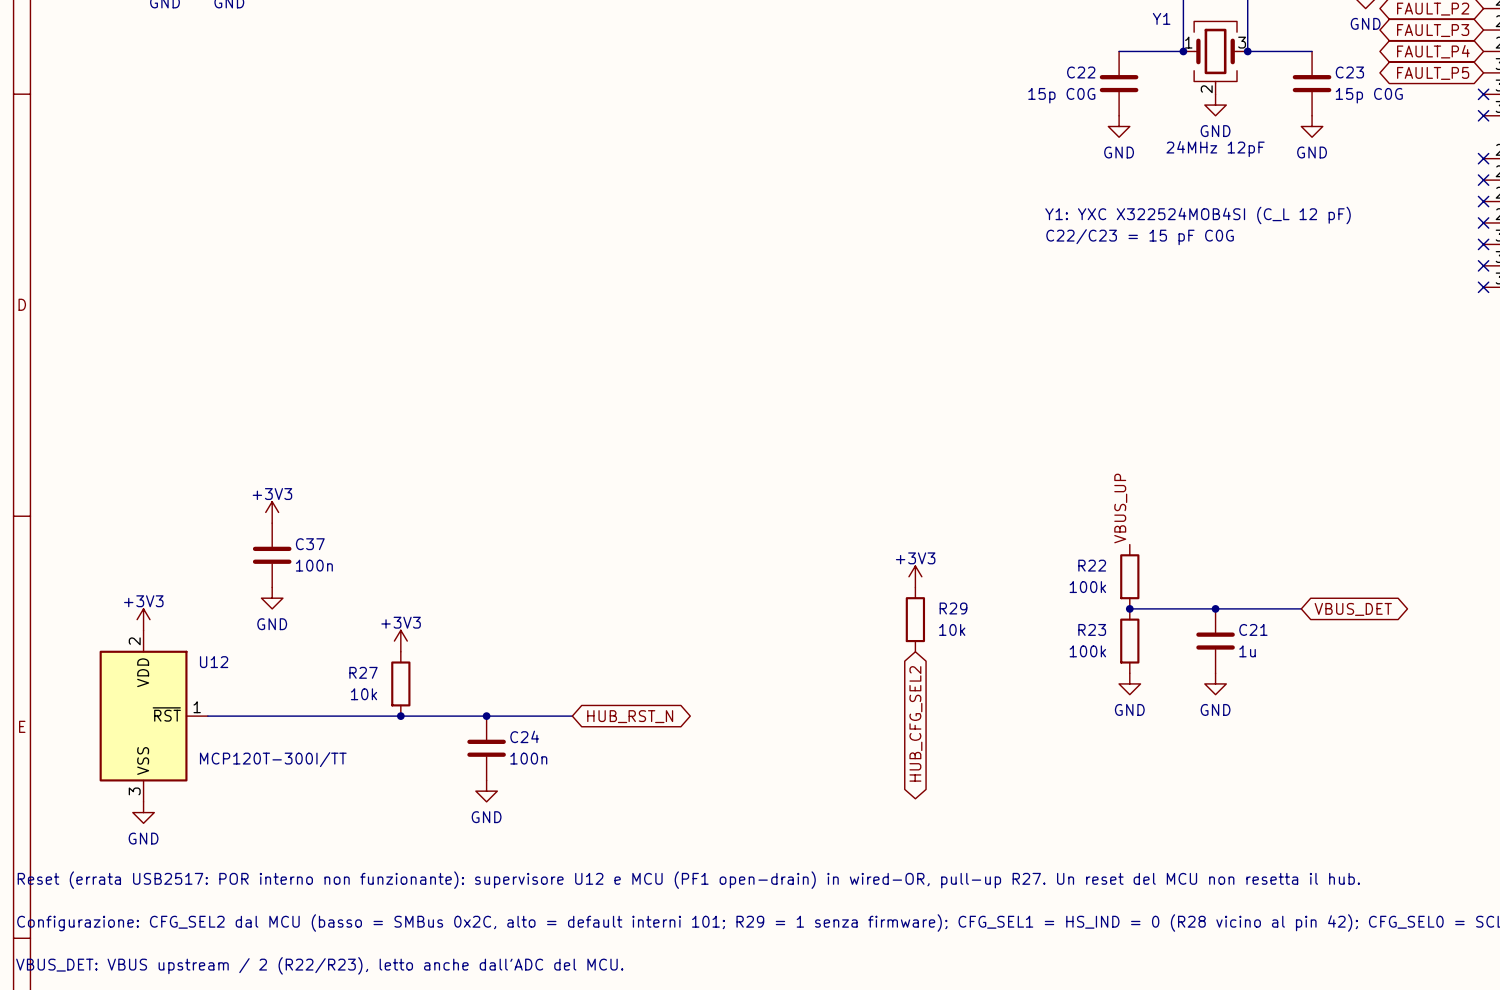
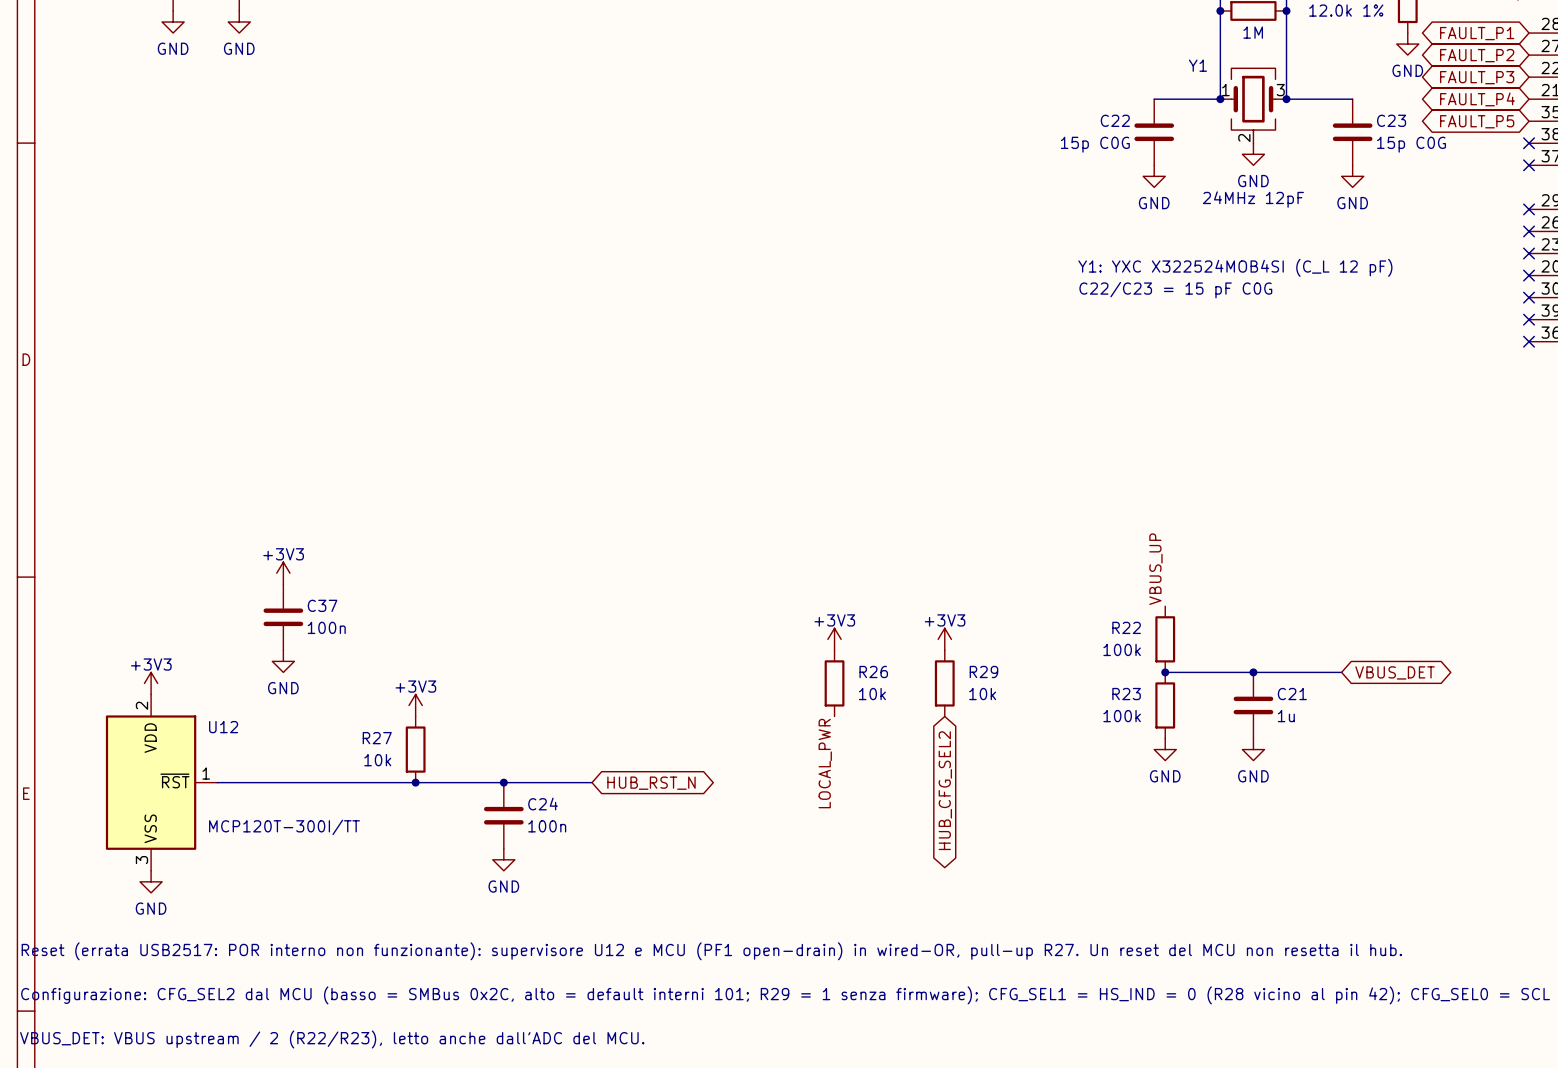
power symbol: none -> +3V3 (834, 639)
R26: none -> 10k (834, 683)
label: none -> LOCAL_PWR (825, 763)

